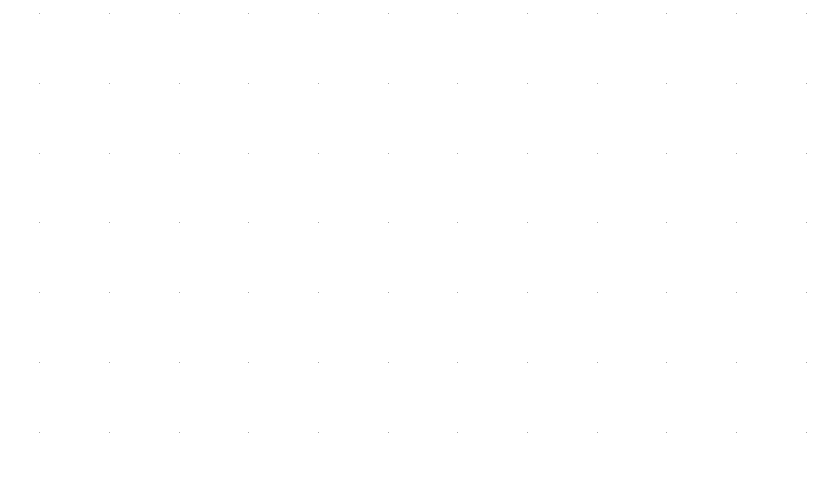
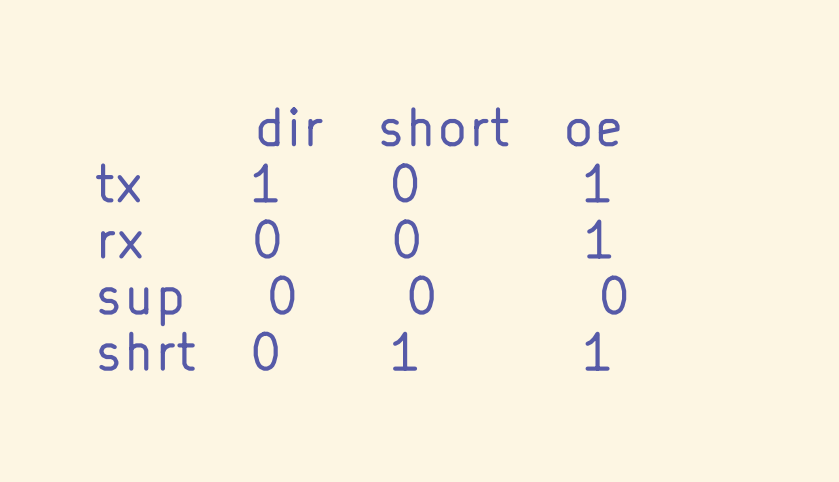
text: none -> dir short oe (439, 126)
text: none -> tx 1 0 1 (352, 182)
text: none -> rx 0 0 1 (356, 239)
text: none -> sup 0 0 0 (362, 300)
text: none -> shrt 0 1 1 (354, 351)

